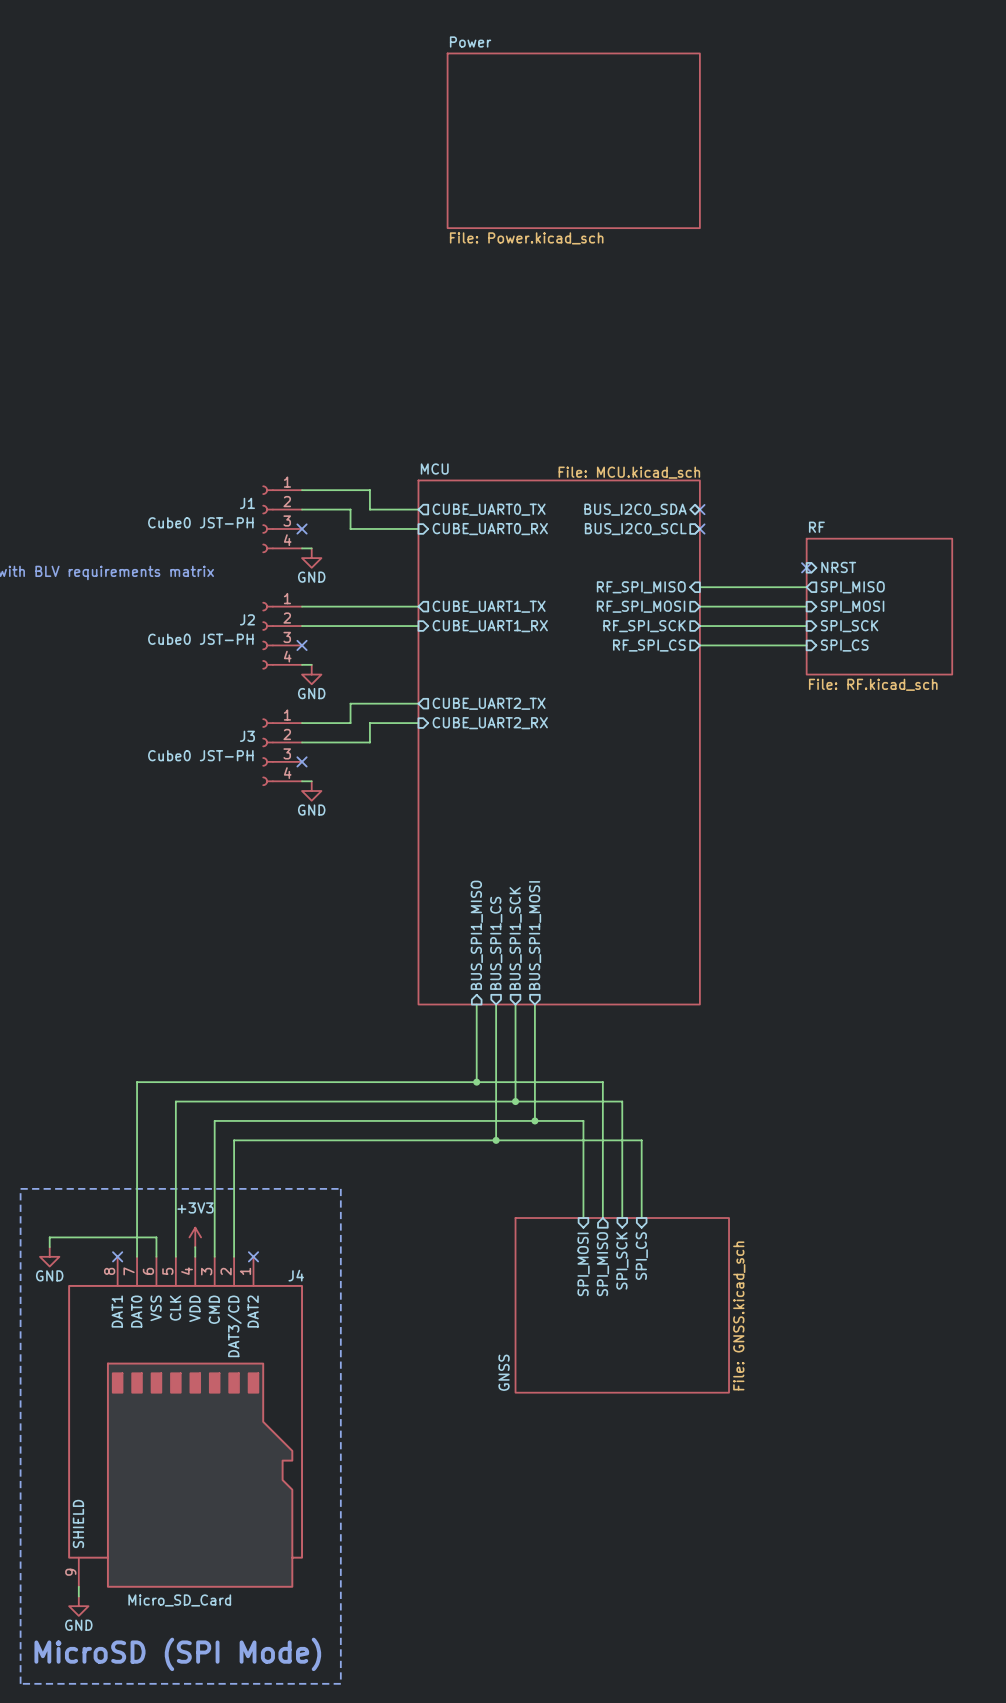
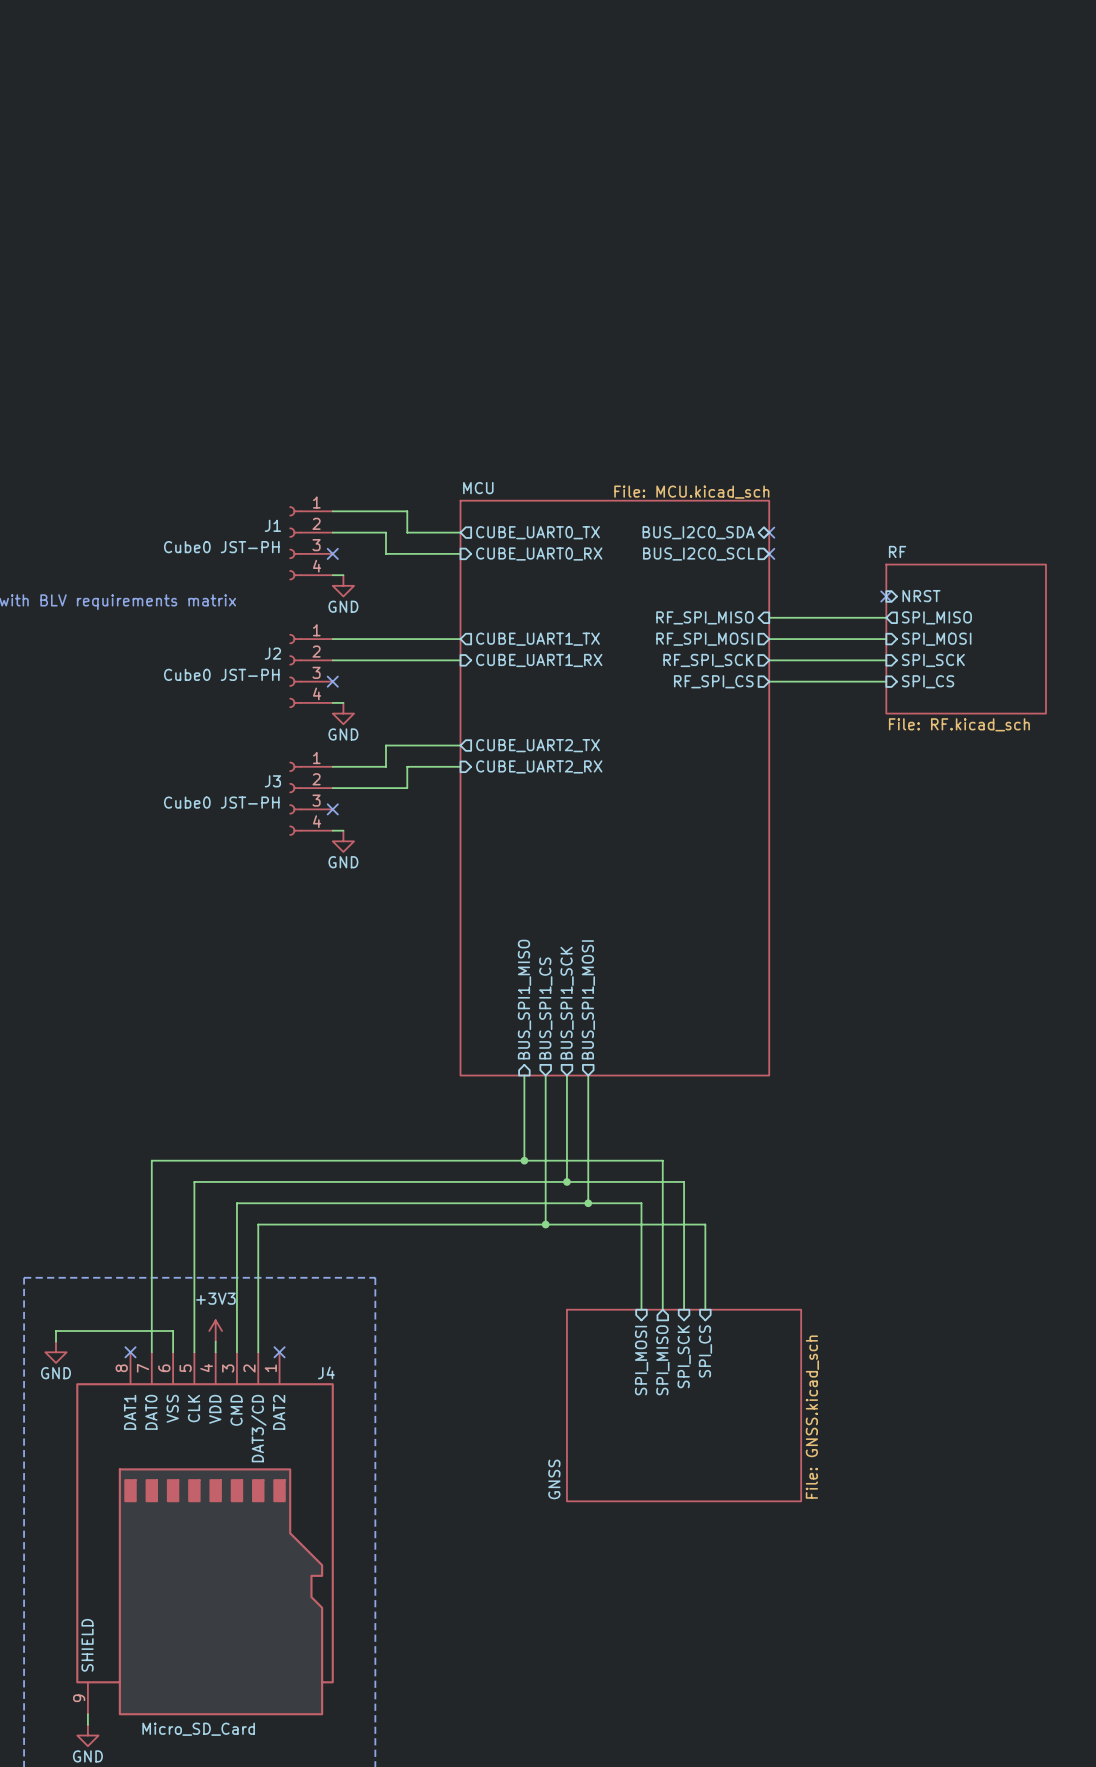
sheet Power: File: Power.kicad_sch (573, 140) -> none

